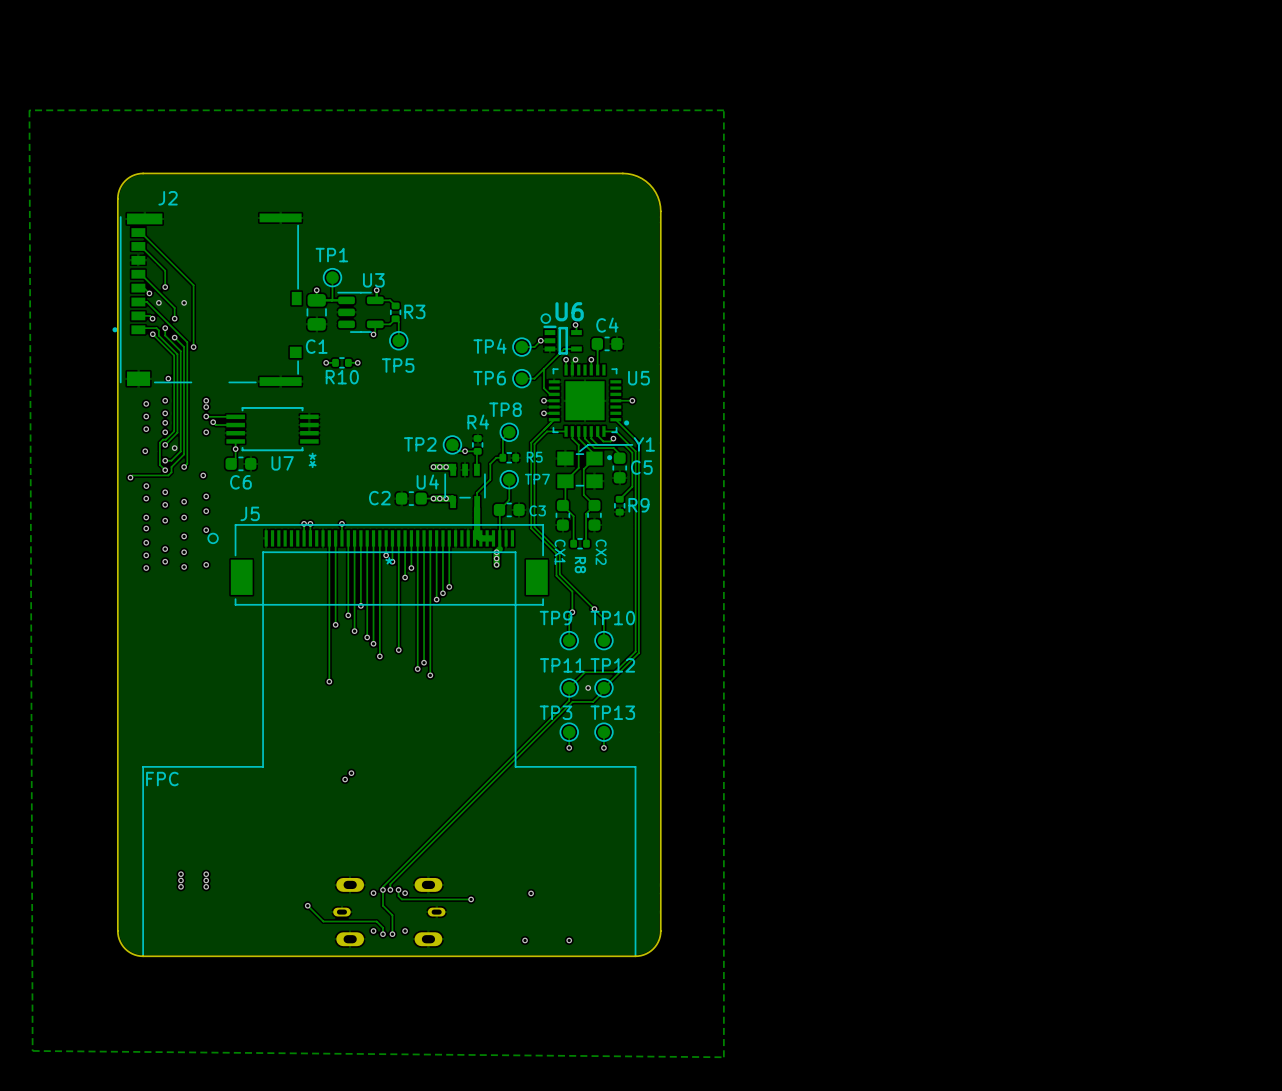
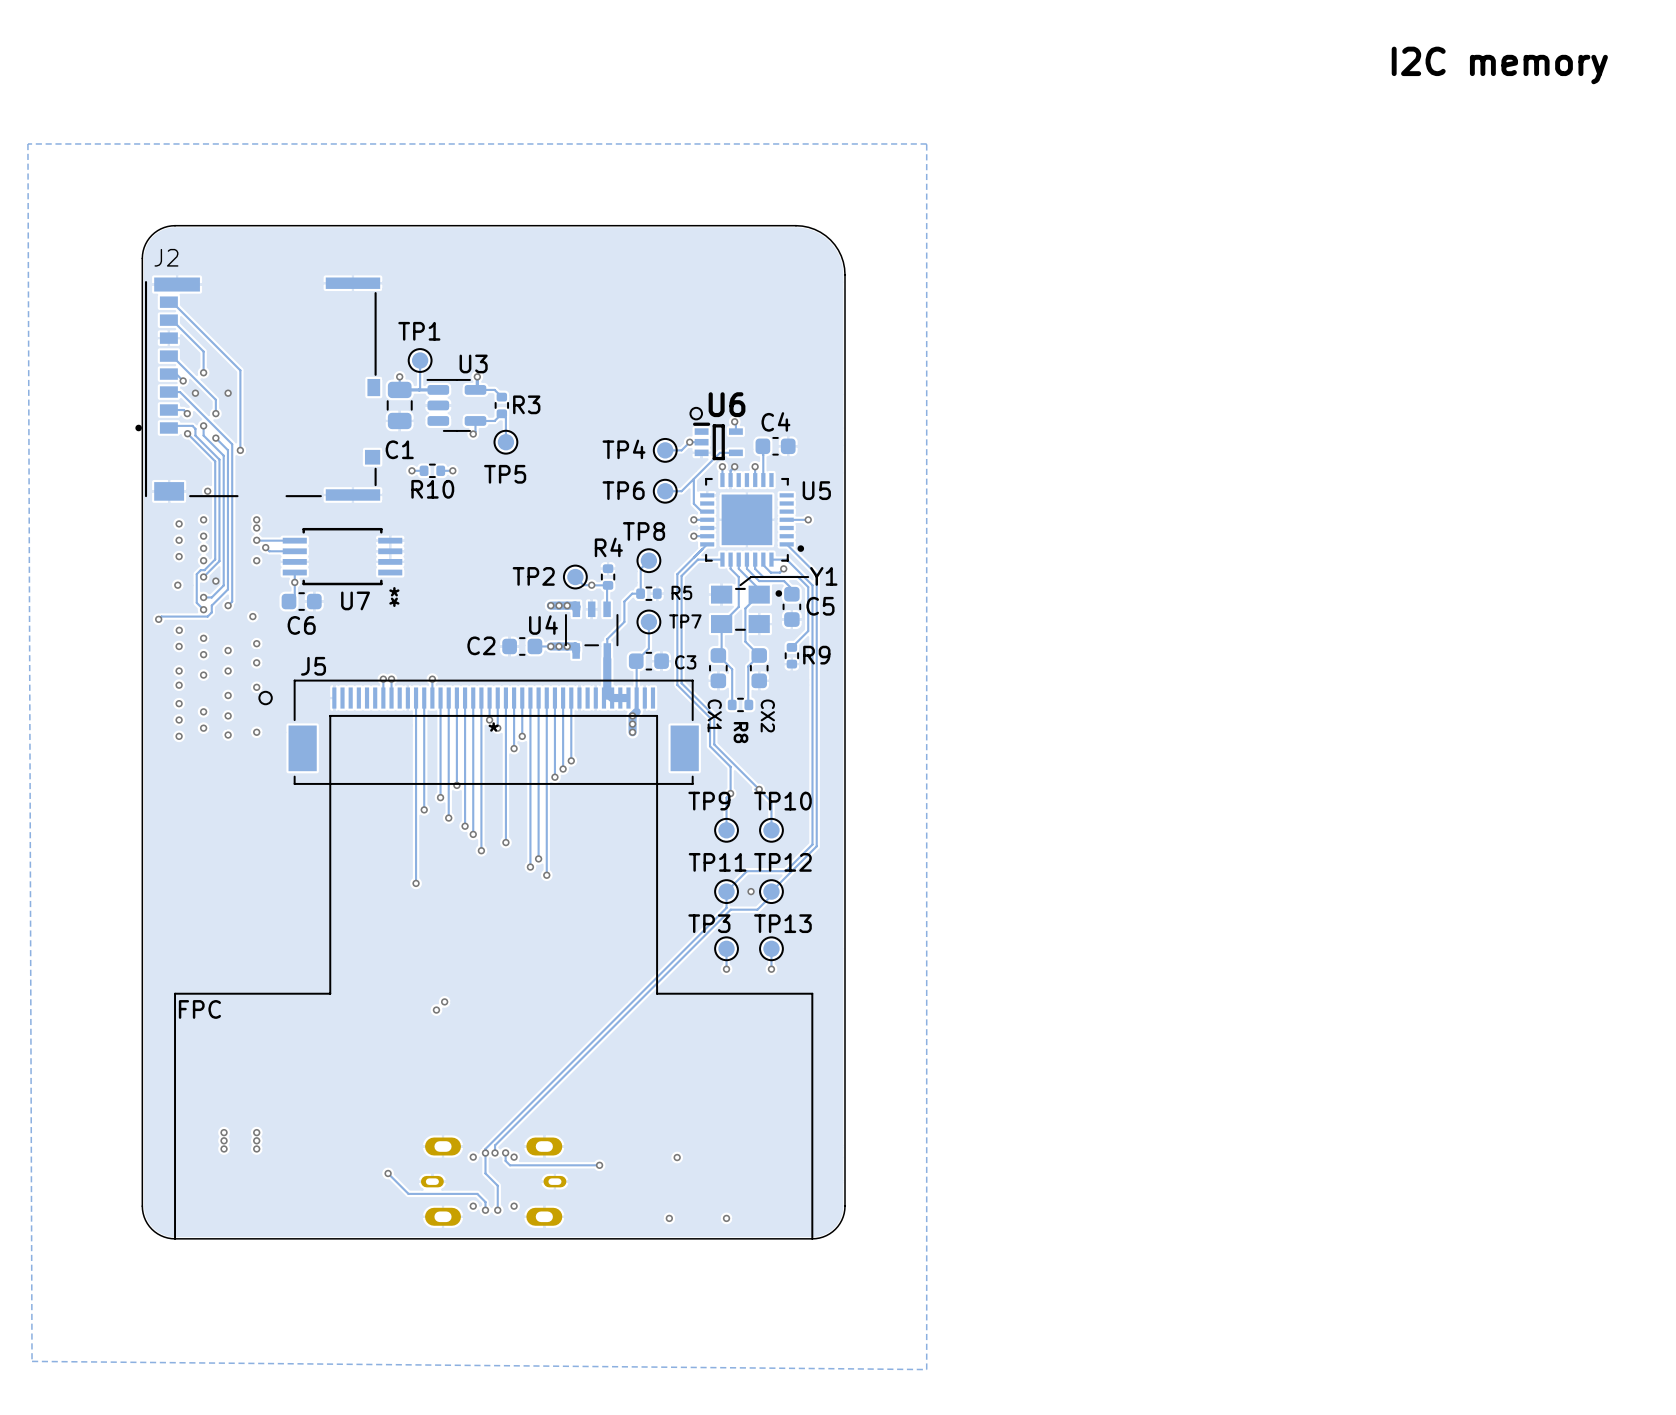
text: none -> I2C memory (1499, 65)
J2 name position: J2 (168, 198) -> J2 (166, 257)

